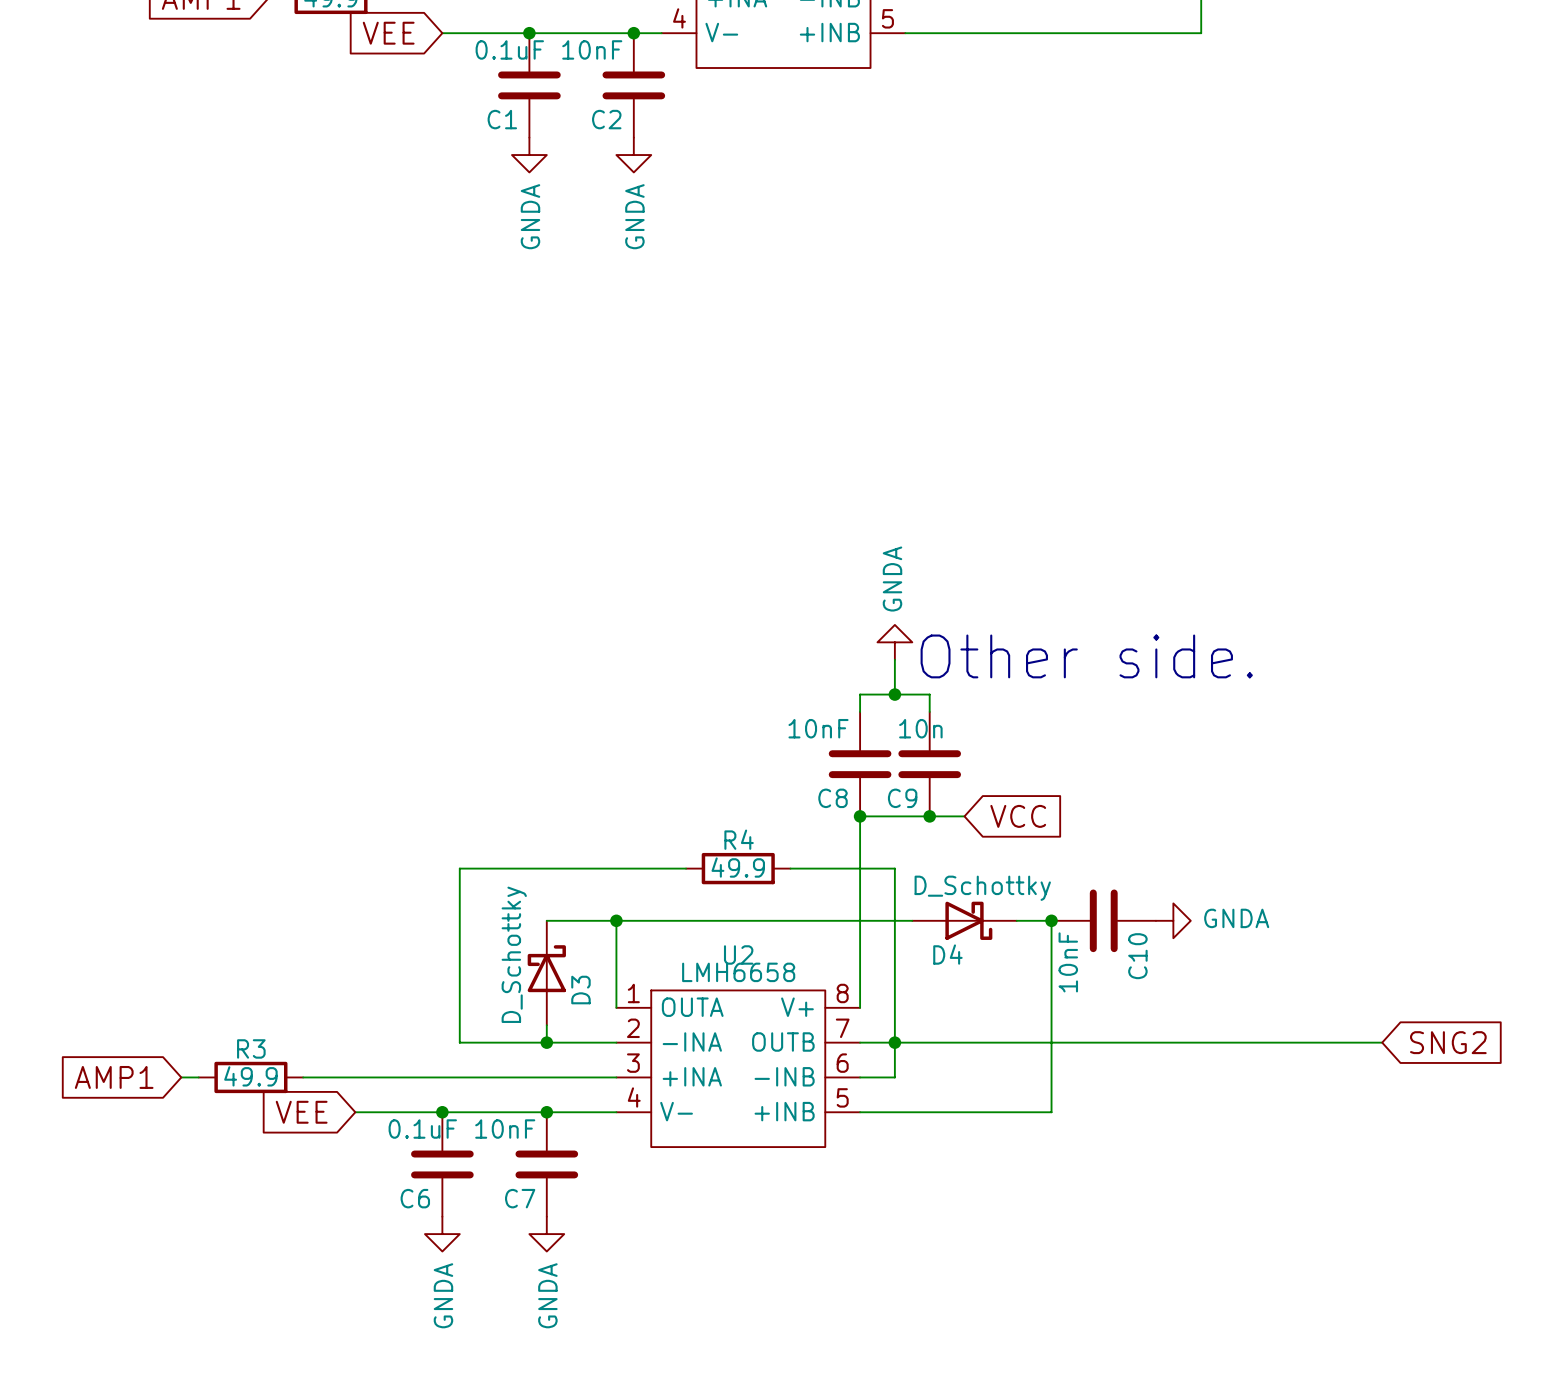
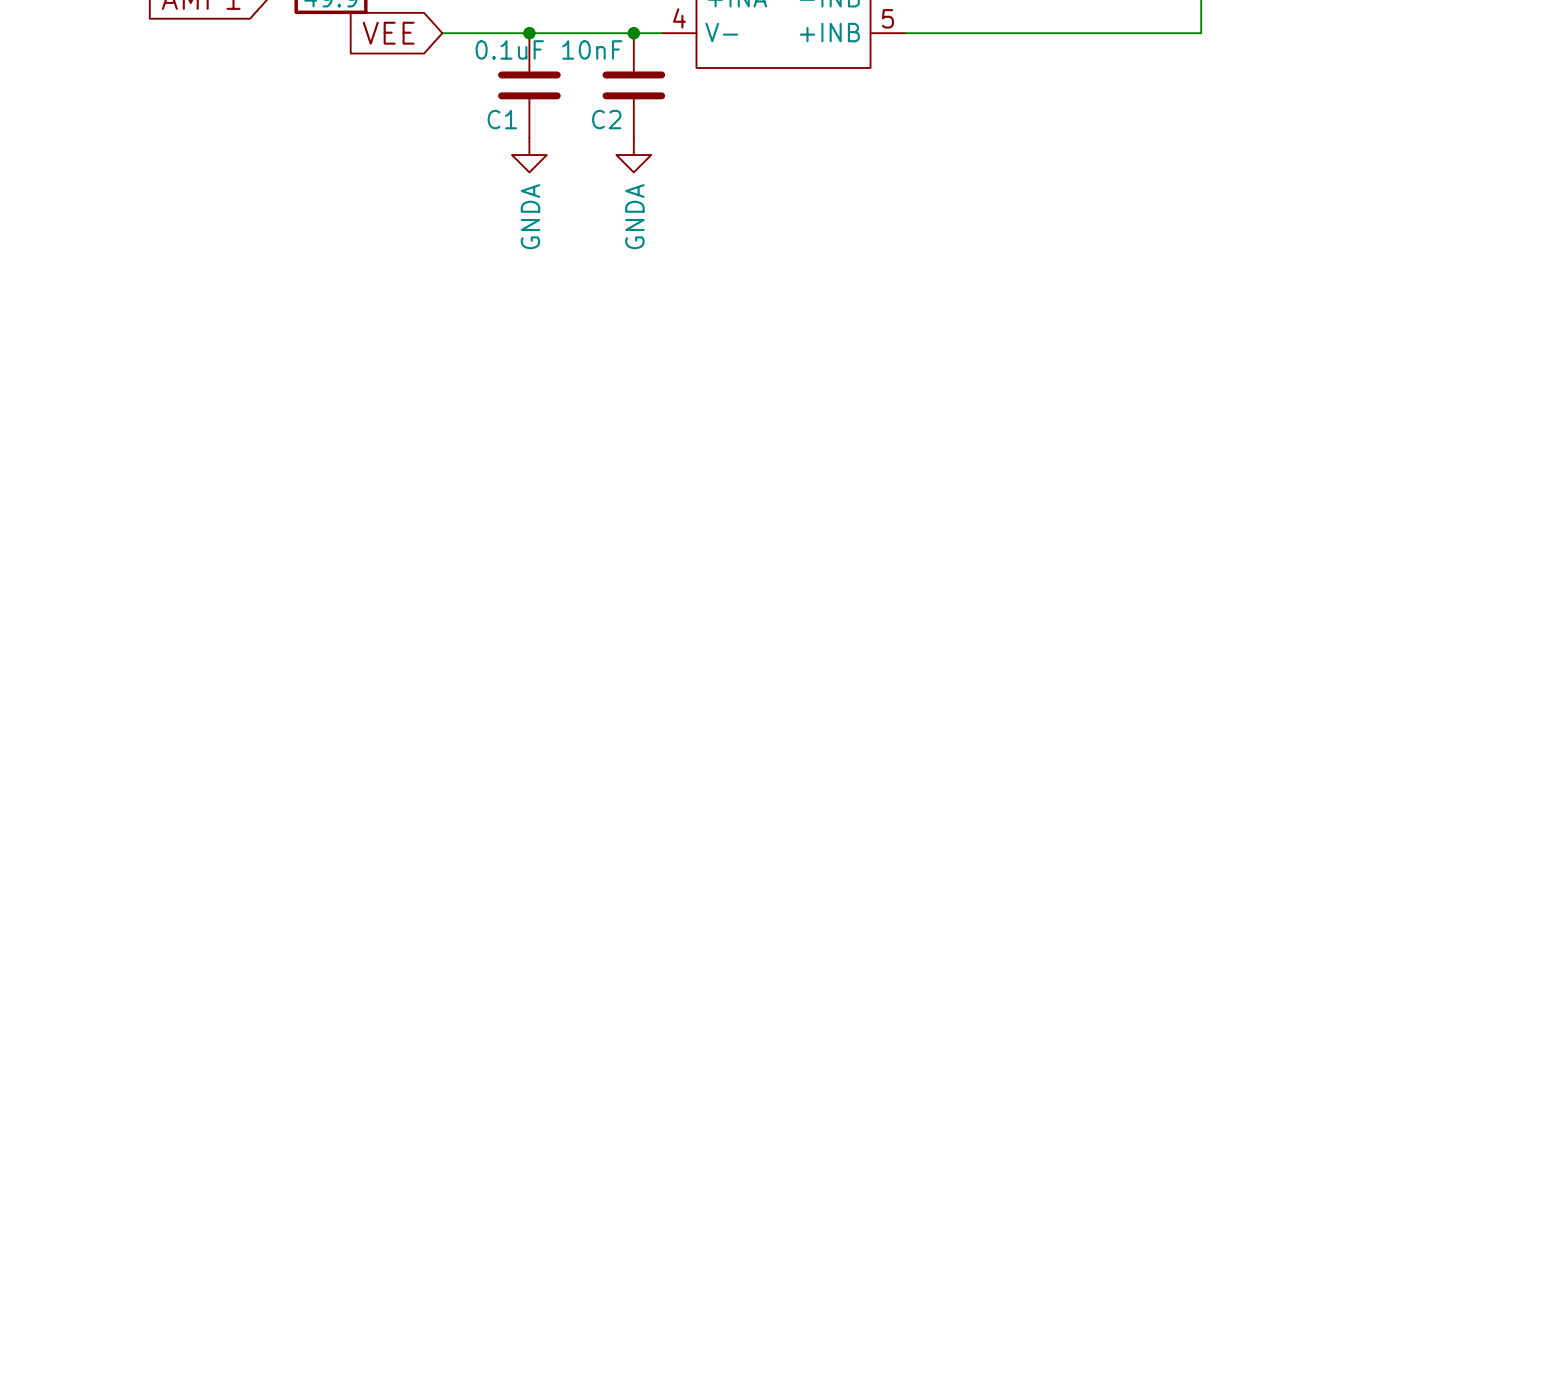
power symbol: GNDA (894, 642) -> none
text: Other side. (1086, 656) -> none
wire: (894, 659) (894, 694) -> none
junction: (894, 694) -> none
wire: (860, 711) (860, 694) (929, 694) (929, 711) -> none
C8: 10nF (860, 764) -> none
C9: 10n (929, 764) -> none
junction: (860, 816) -> none
junction: (929, 816) -> none
wire: (964, 816) (860, 816) (860, 1007) -> none
global label: VCC (1018, 816) -> none
wire: (686, 868) (459, 868) (459, 1042) (616, 1042) -> none
R4: 49.9 (738, 868) -> none
wire: (790, 868) (894, 868) (894, 1077) (860, 1077) -> none
wire: (546, 920) (912, 920) -> none
wire: (616, 920) (616, 1007) -> none
junction: (616, 920) -> none
D4: D_Schottky (964, 920) -> none
wire: (1016, 920) (1051, 920) (1051, 1112) (860, 1112) -> none
junction: (1051, 920) -> none
C10: 10nF (1103, 920) -> none
power symbol: GNDA (1173, 920) -> none
D3: D_Schottky (546, 973) -> none
wire: (546, 1025) (546, 1042) -> none
junction: (546, 1042) -> none
wire: (860, 1042) (1382, 1042) -> none
junction: (894, 1042) -> none
global label: SNG2 (1448, 1042) -> none
U2: LMH6658 (738, 1068) -> none
global label: AMP1 (114, 1077) -> none
wire: (181, 1077) (198, 1077) -> none
R3: 49.9 (250, 1077) -> none
wire: (303, 1077) (616, 1077) -> none
global label: VEE (301, 1112) -> none
wire: (355, 1112) (616, 1112) -> none
junction: (442, 1112) -> none
junction: (546, 1112) -> none
C6: 0.1uF (442, 1164) -> none
C7: 10nF (546, 1164) -> none
power symbol: GNDA (442, 1234) -> none
power symbol: GNDA (546, 1234) -> none

